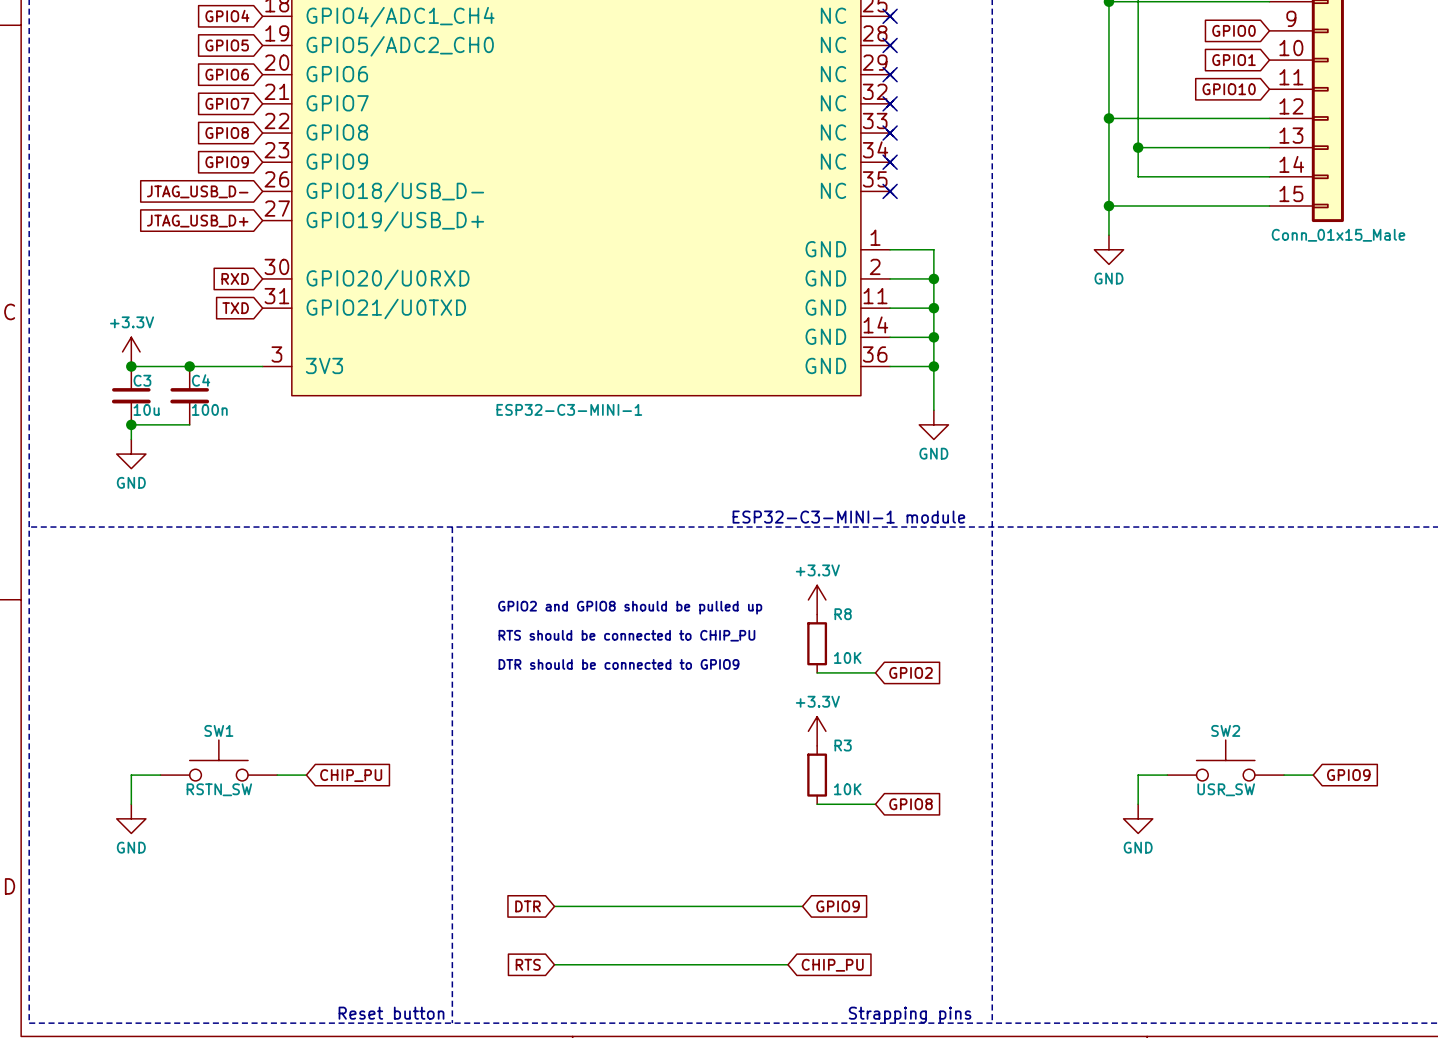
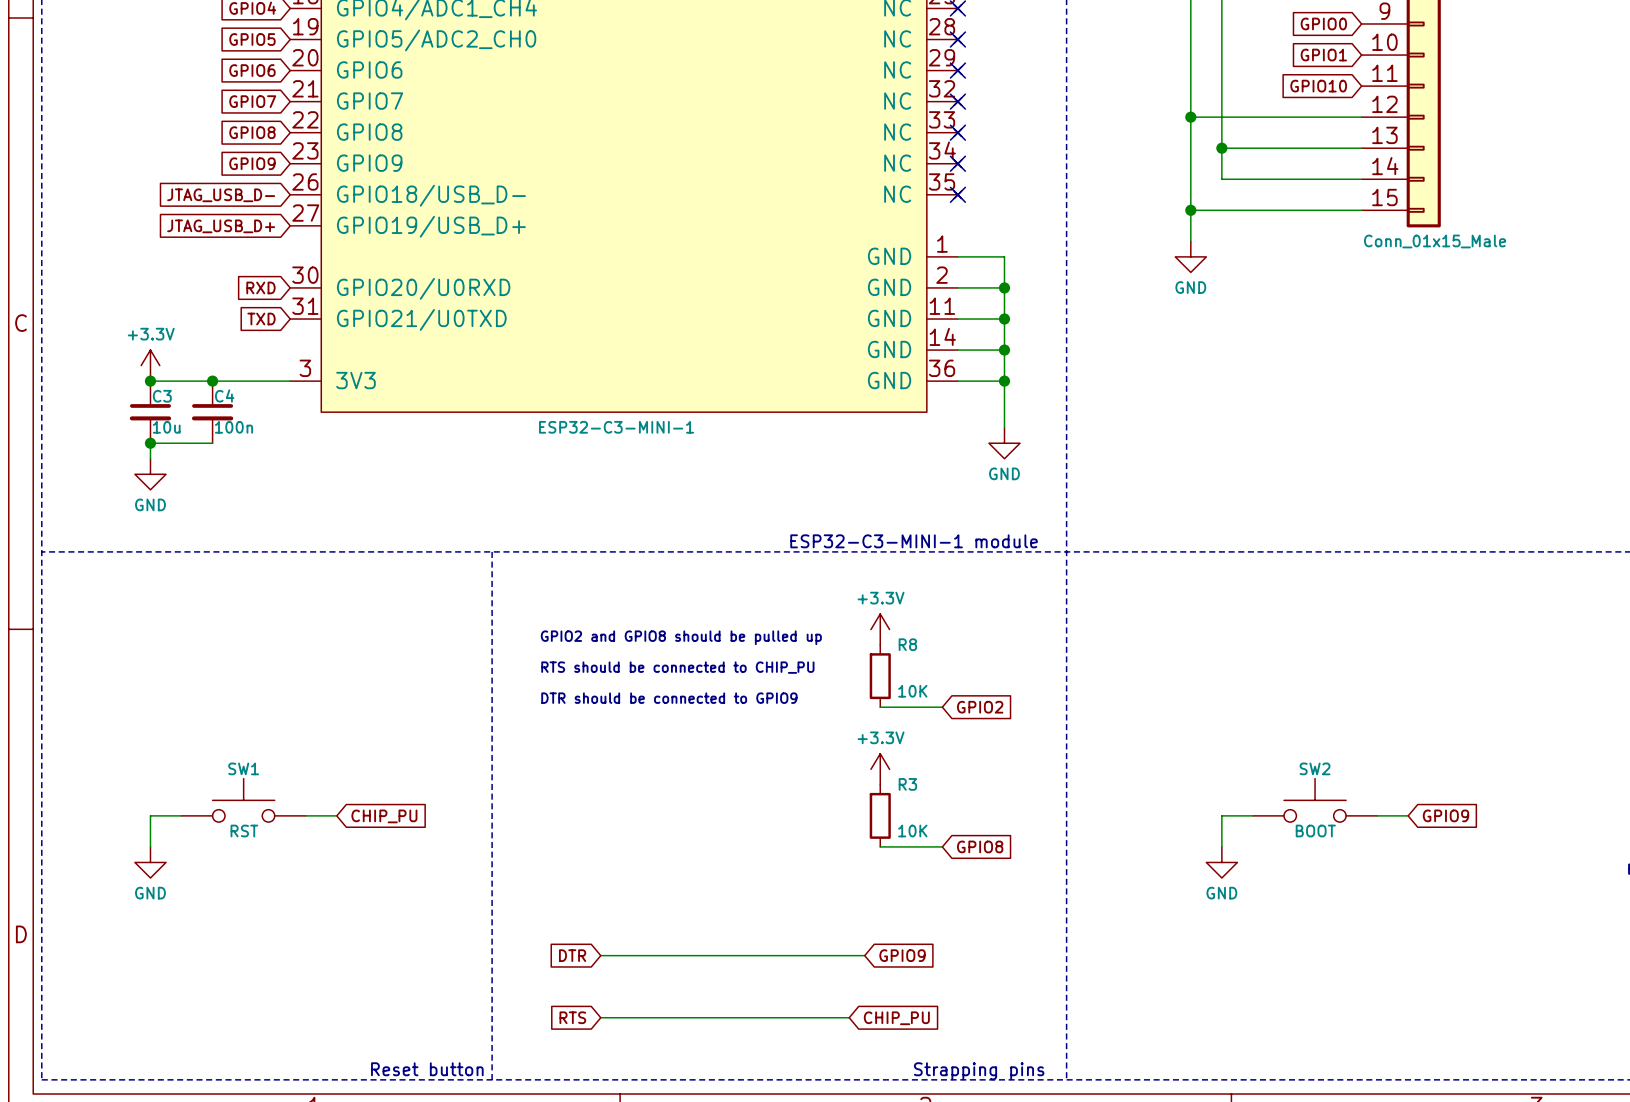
SW1 value: RSTN_SW (219, 789) -> RST (244, 831)
SW2 value: USR_SW (1226, 789) -> BOOT (1315, 831)

